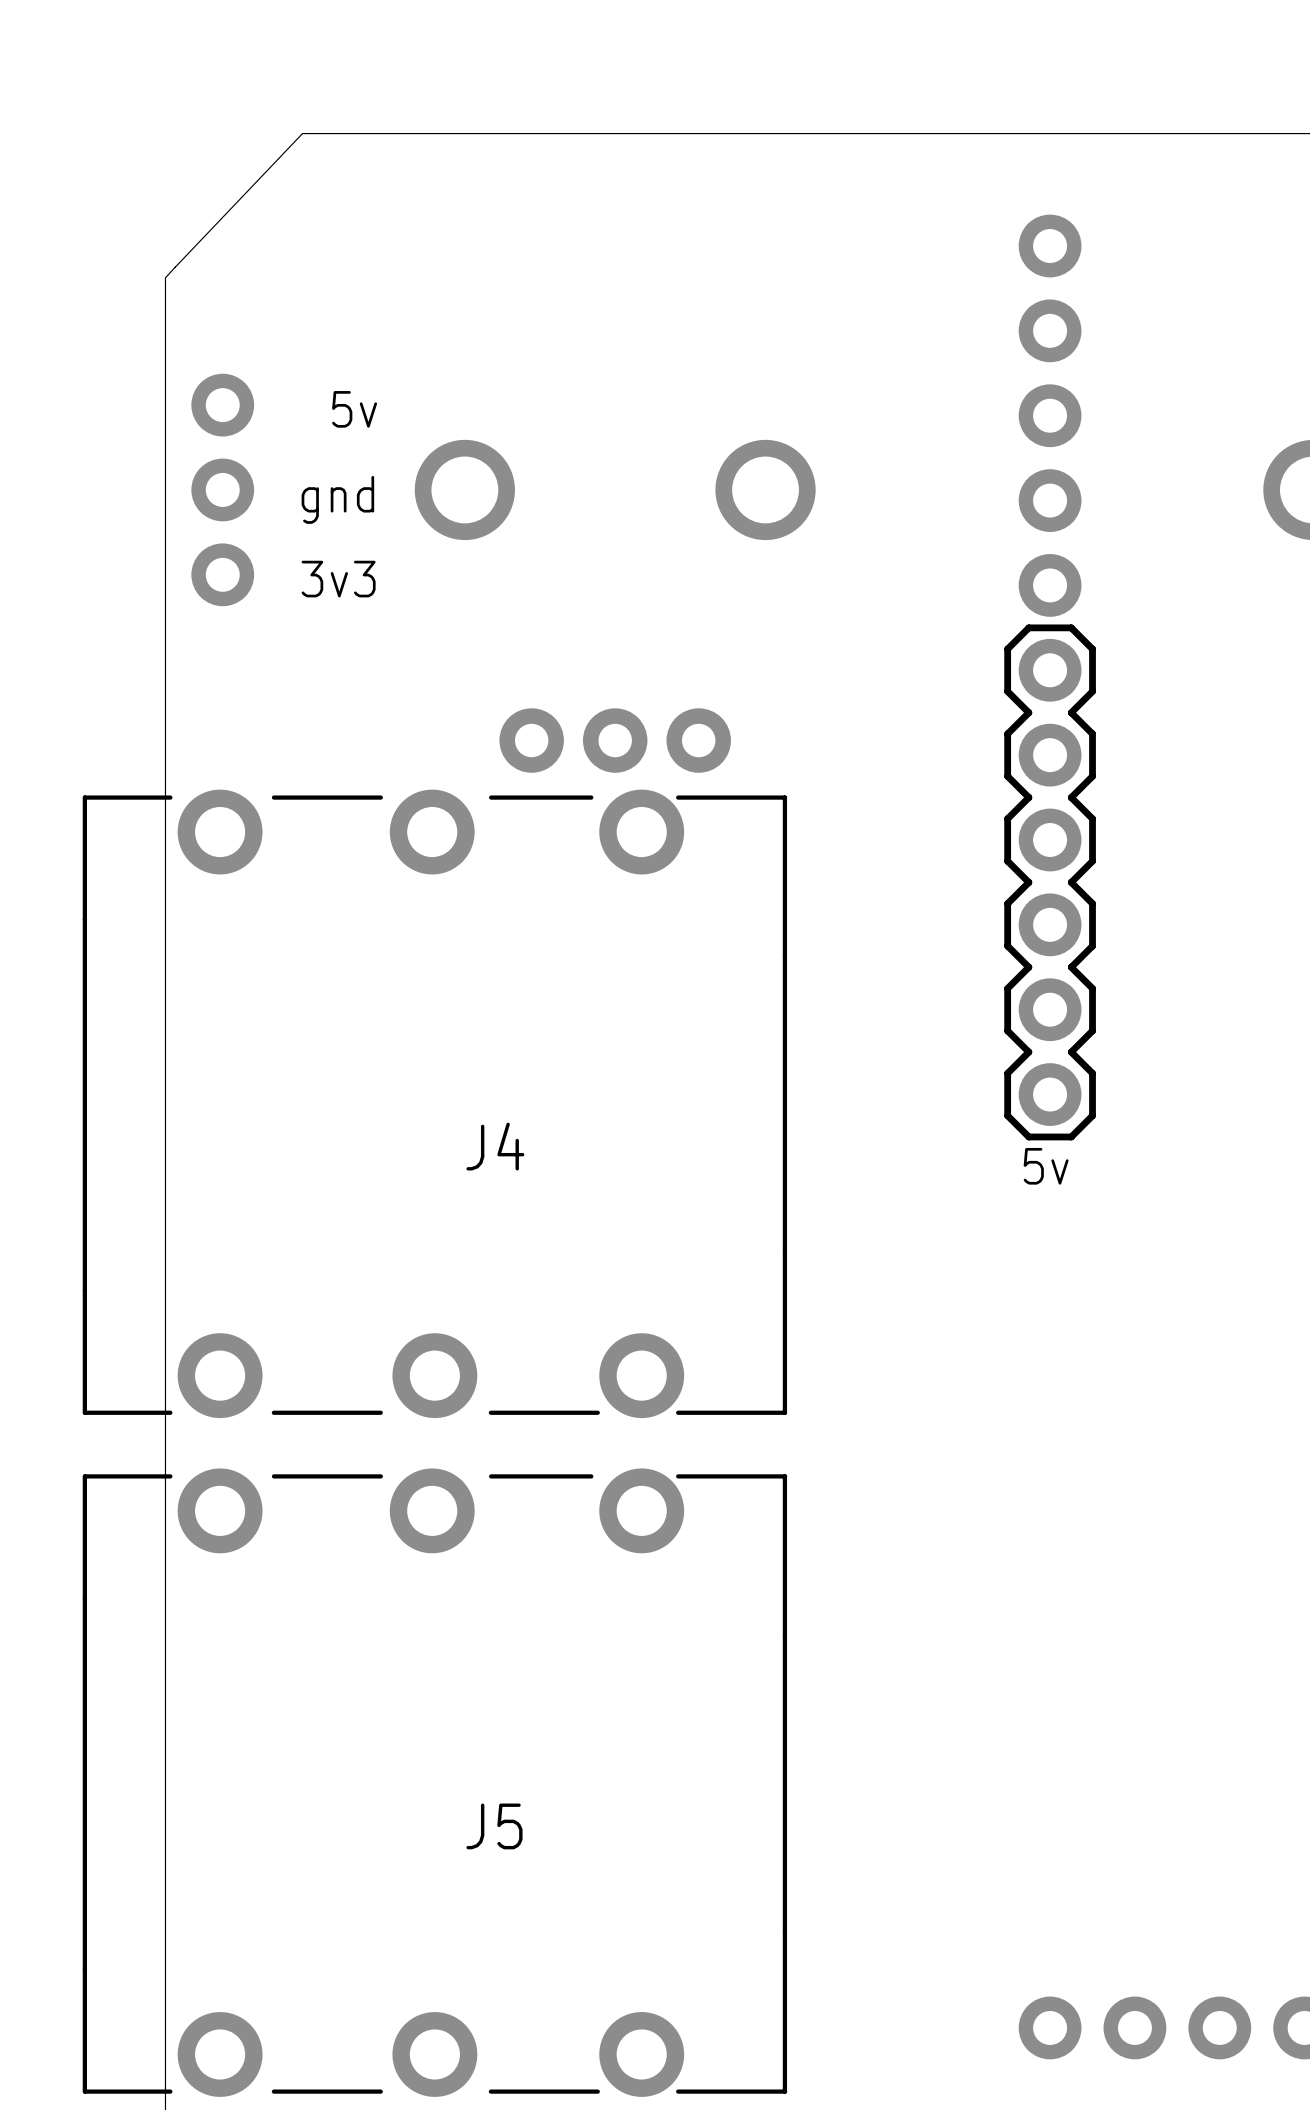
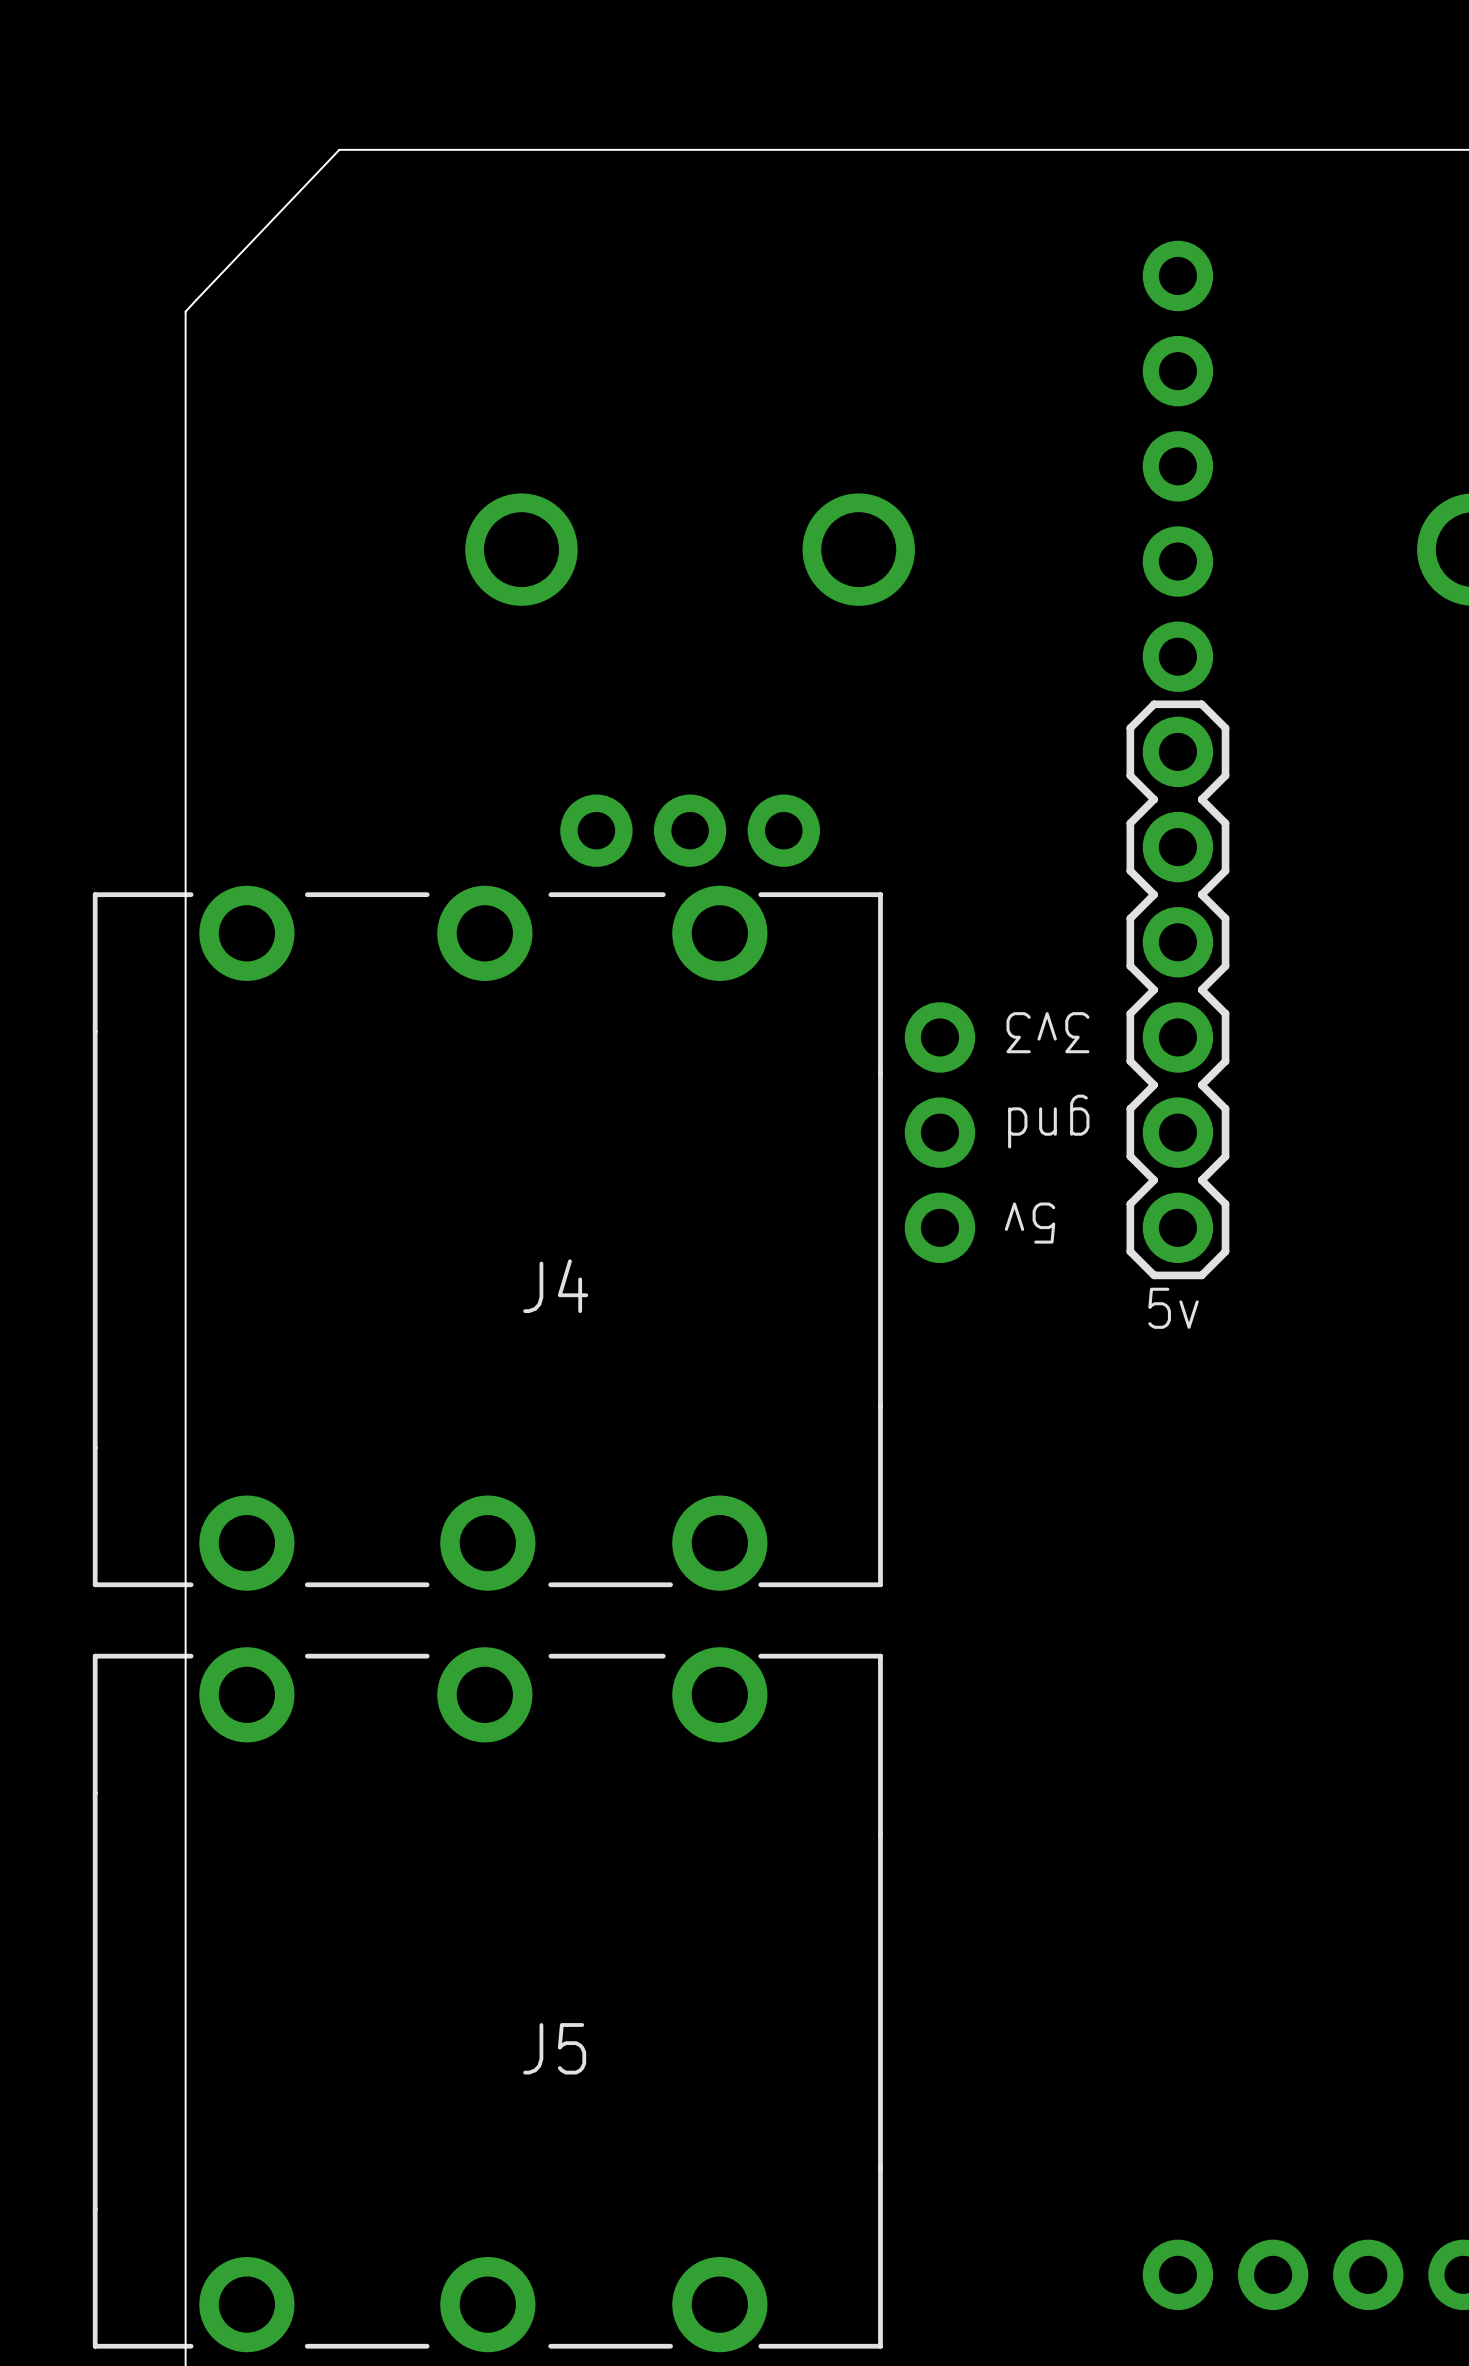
text rotation: 0° (354, 409) -> 180° (1030, 1223)
text position: 5v (354, 409) -> 5v (1030, 1223)
part position: (222, 489) -> (939, 1132)
text rotation: 0° (337, 499) -> 180° (1048, 1121)
text position: gnd (337, 499) -> gnd (1048, 1121)
text rotation: 0° (338, 579) -> 180° (1047, 1032)
text position: 3v3 (338, 579) -> 3v3 (1047, 1032)

